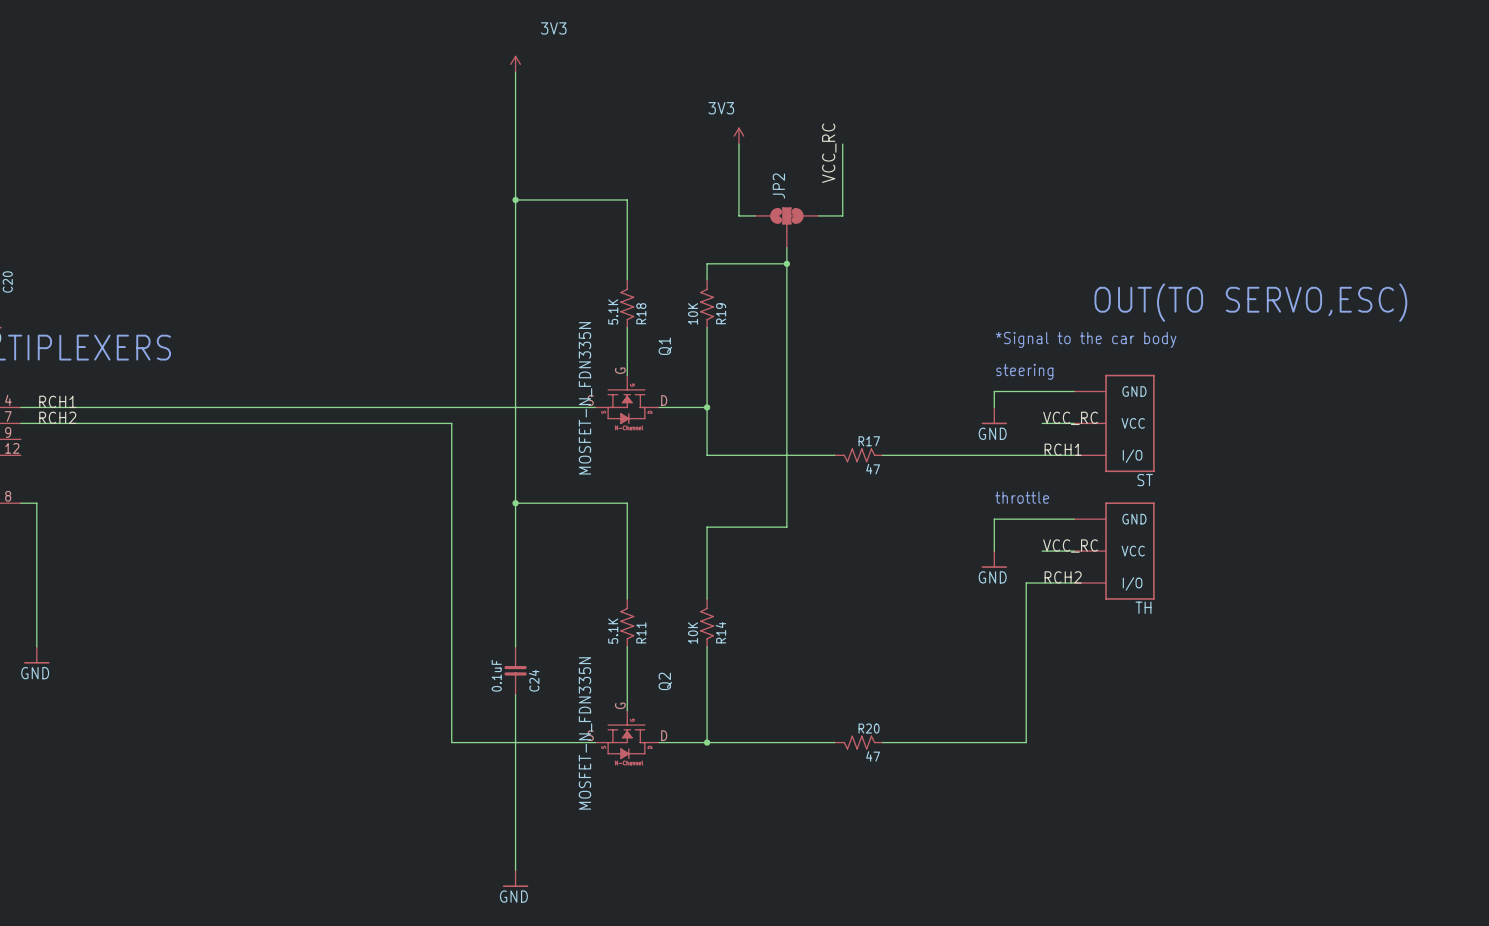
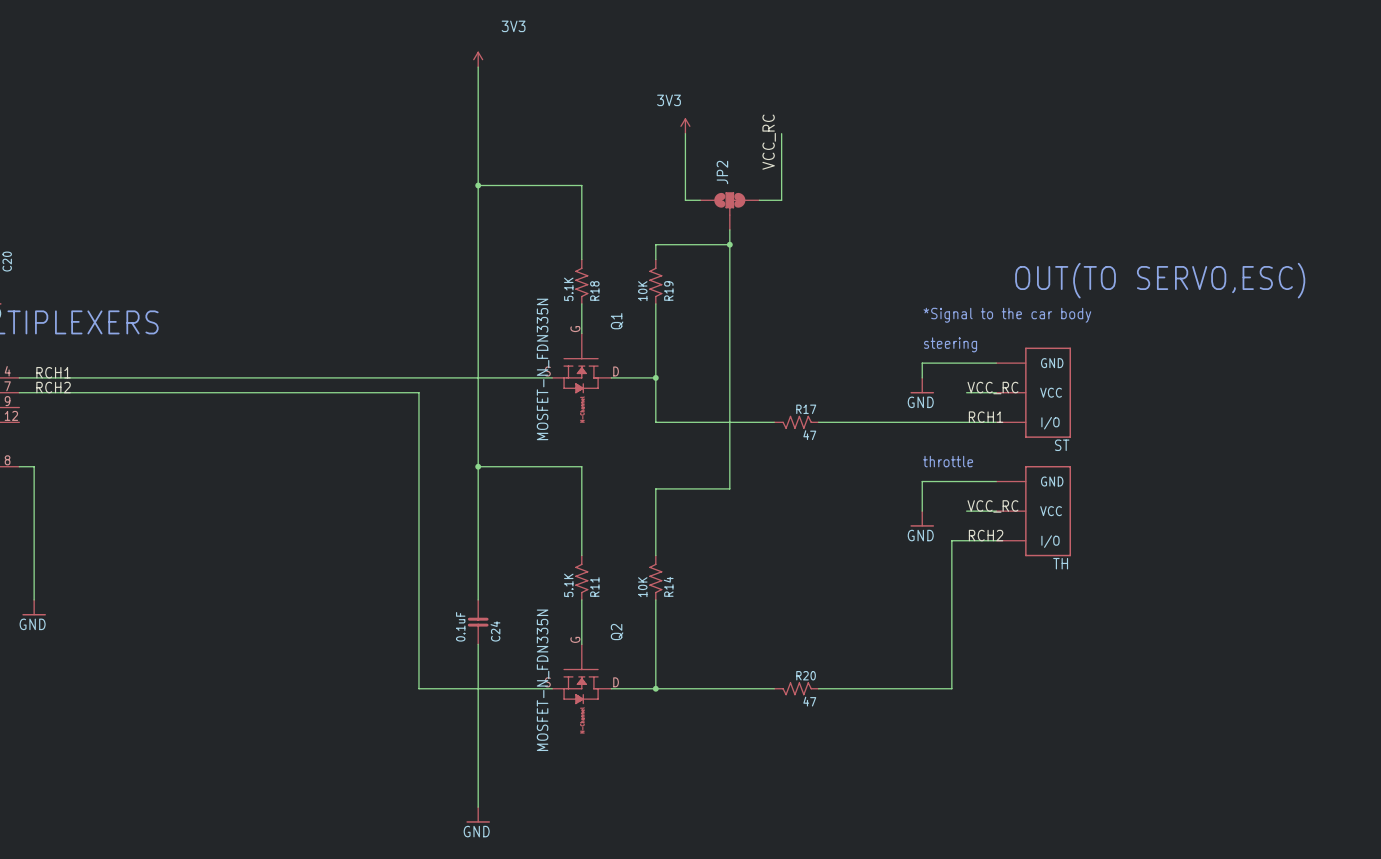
Q1 symbol: [594, 374, 660, 425] -> [551, 332, 612, 394]
Q2 symbol: [594, 710, 660, 760] -> [551, 643, 612, 705]

